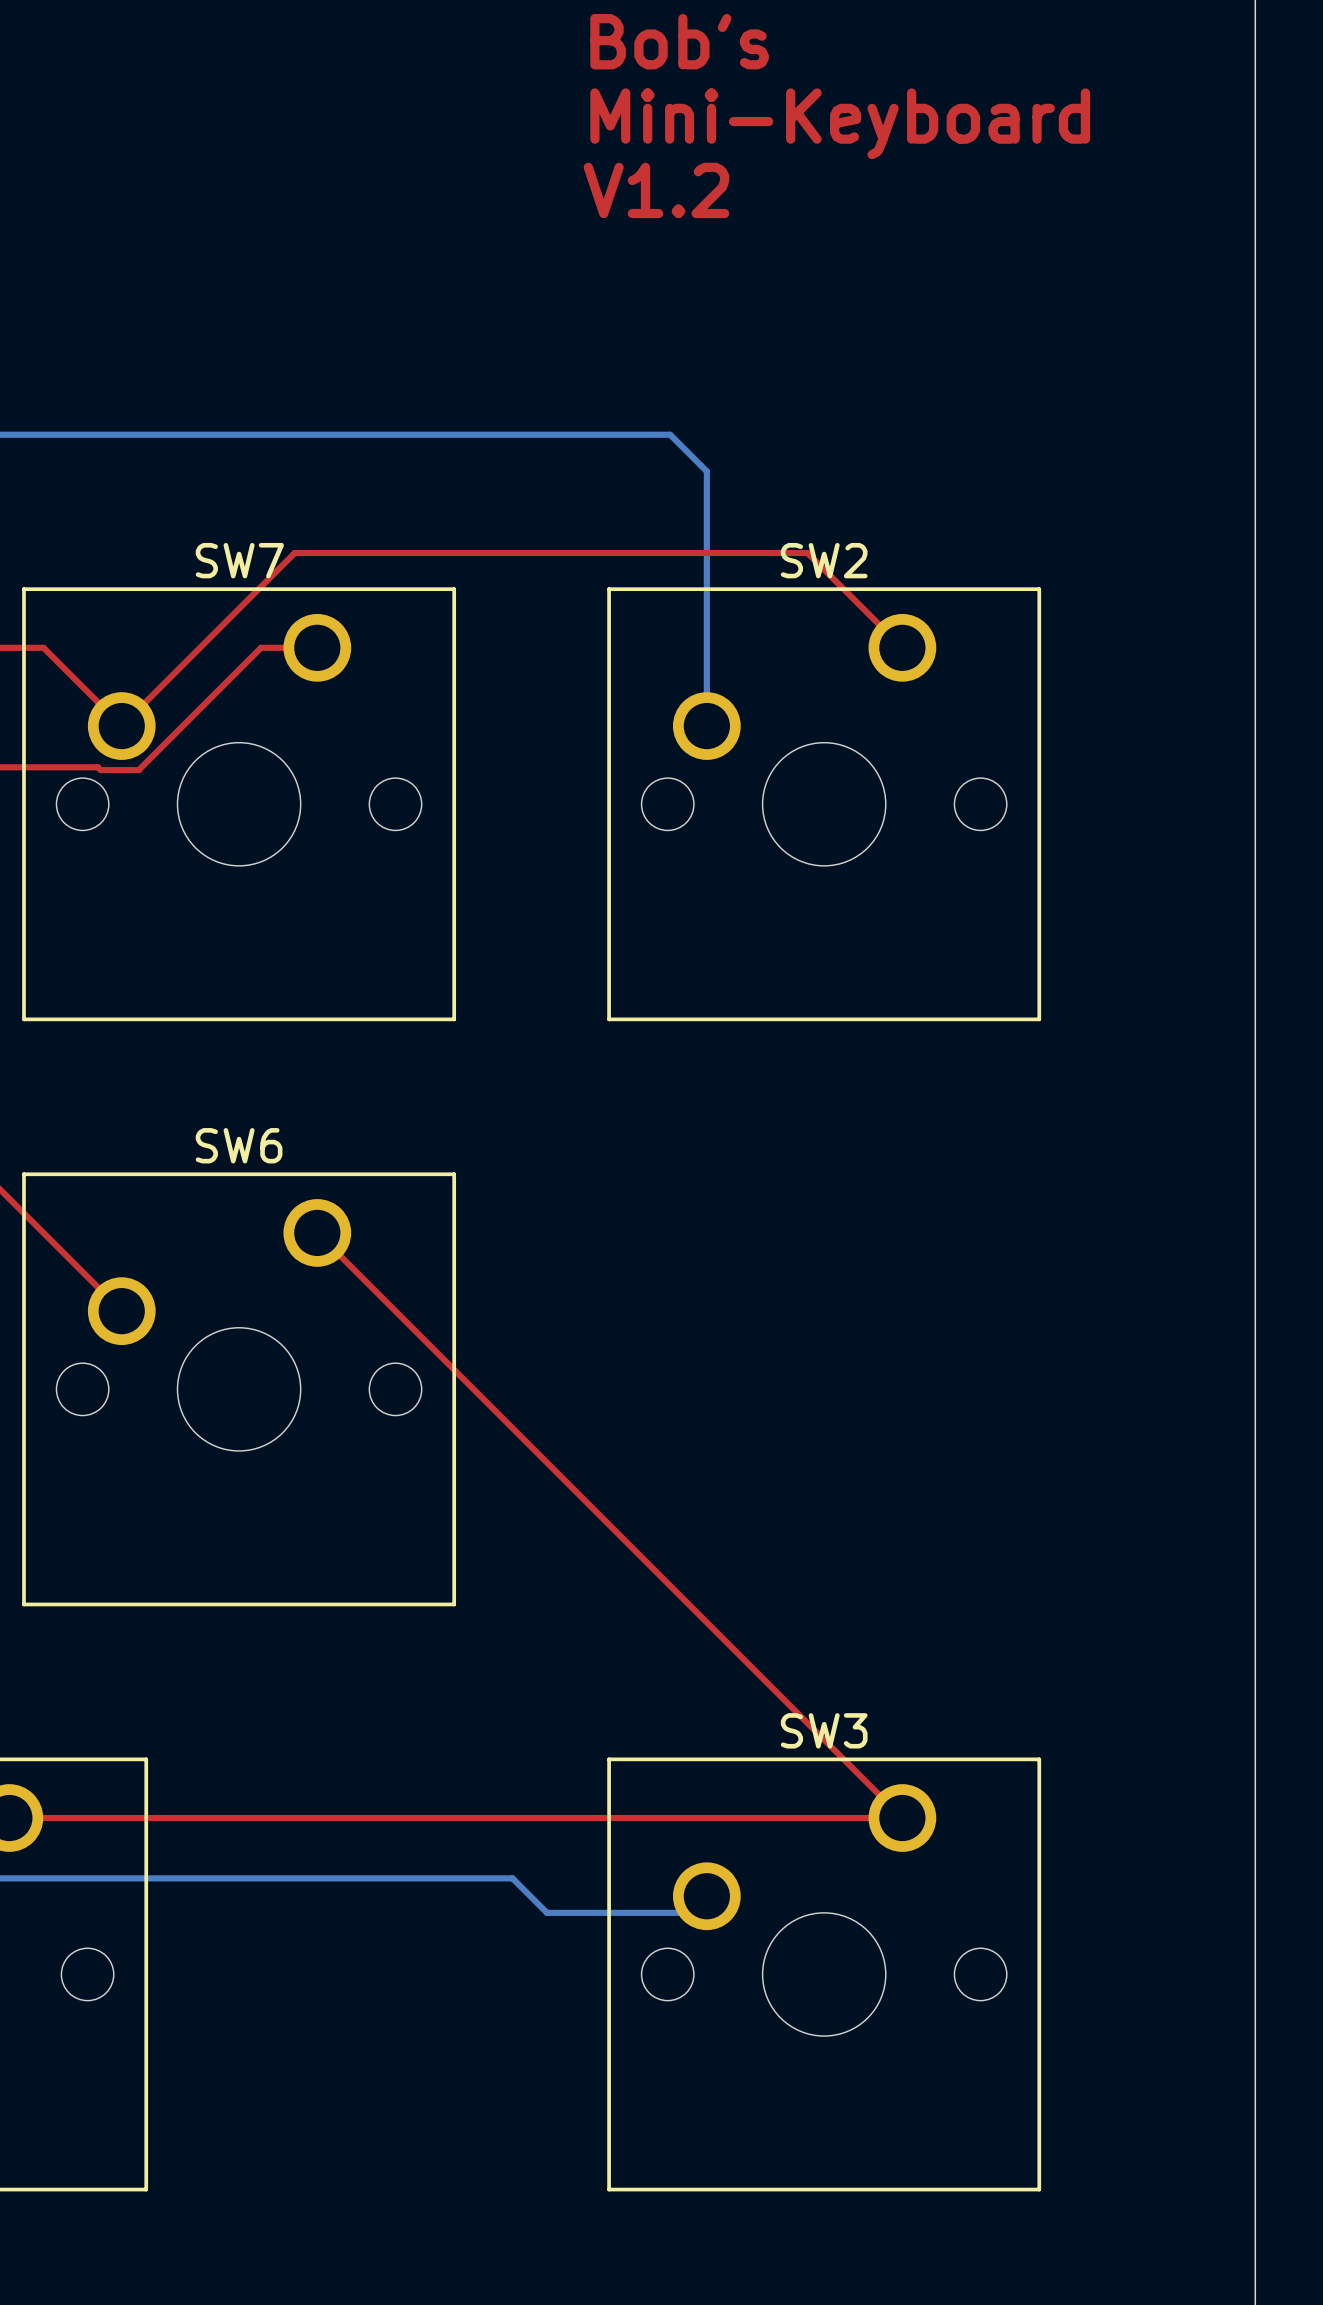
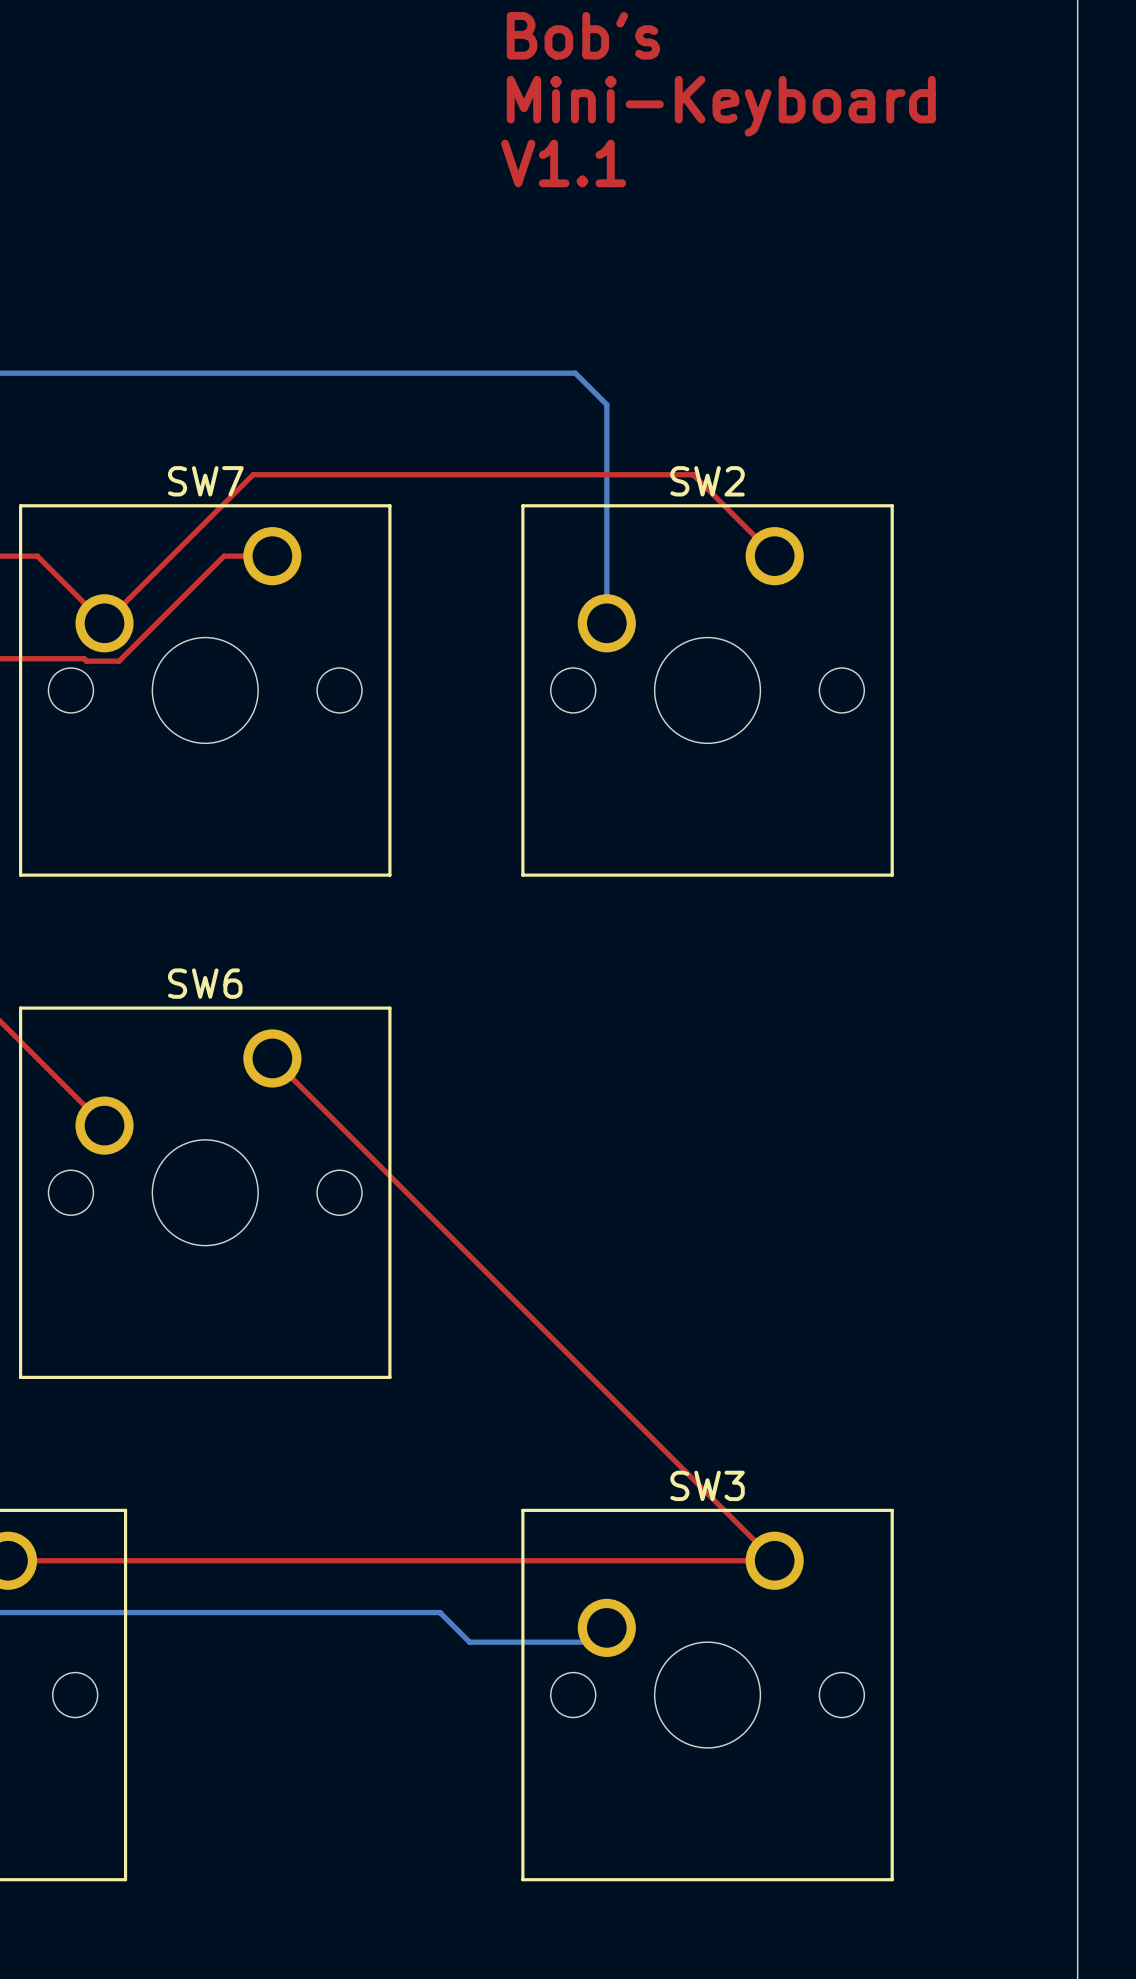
text: V1.2 (656, 190) -> V1.1 (563, 163)

